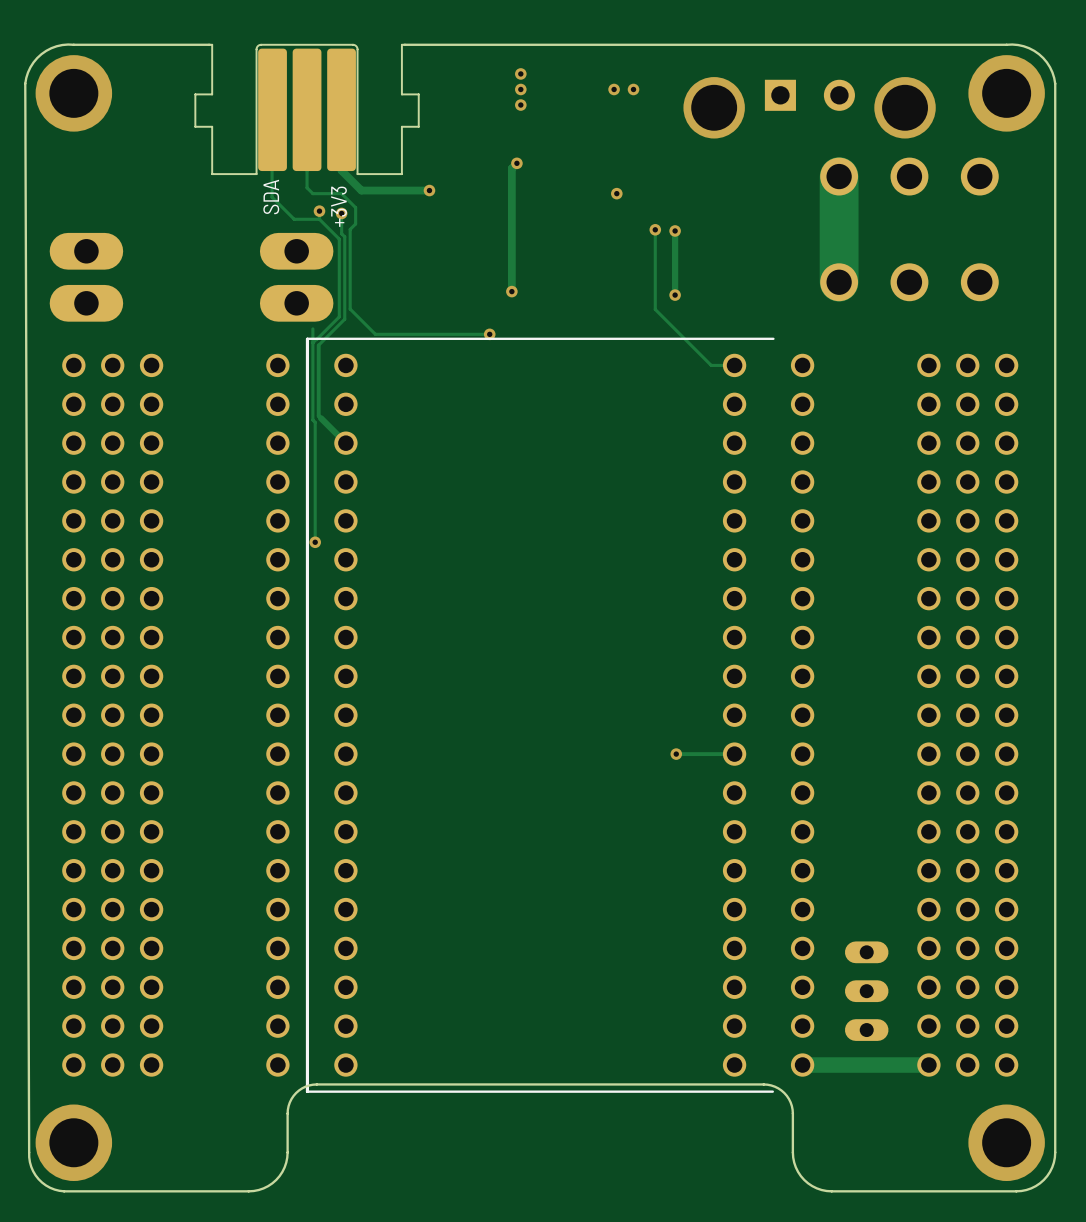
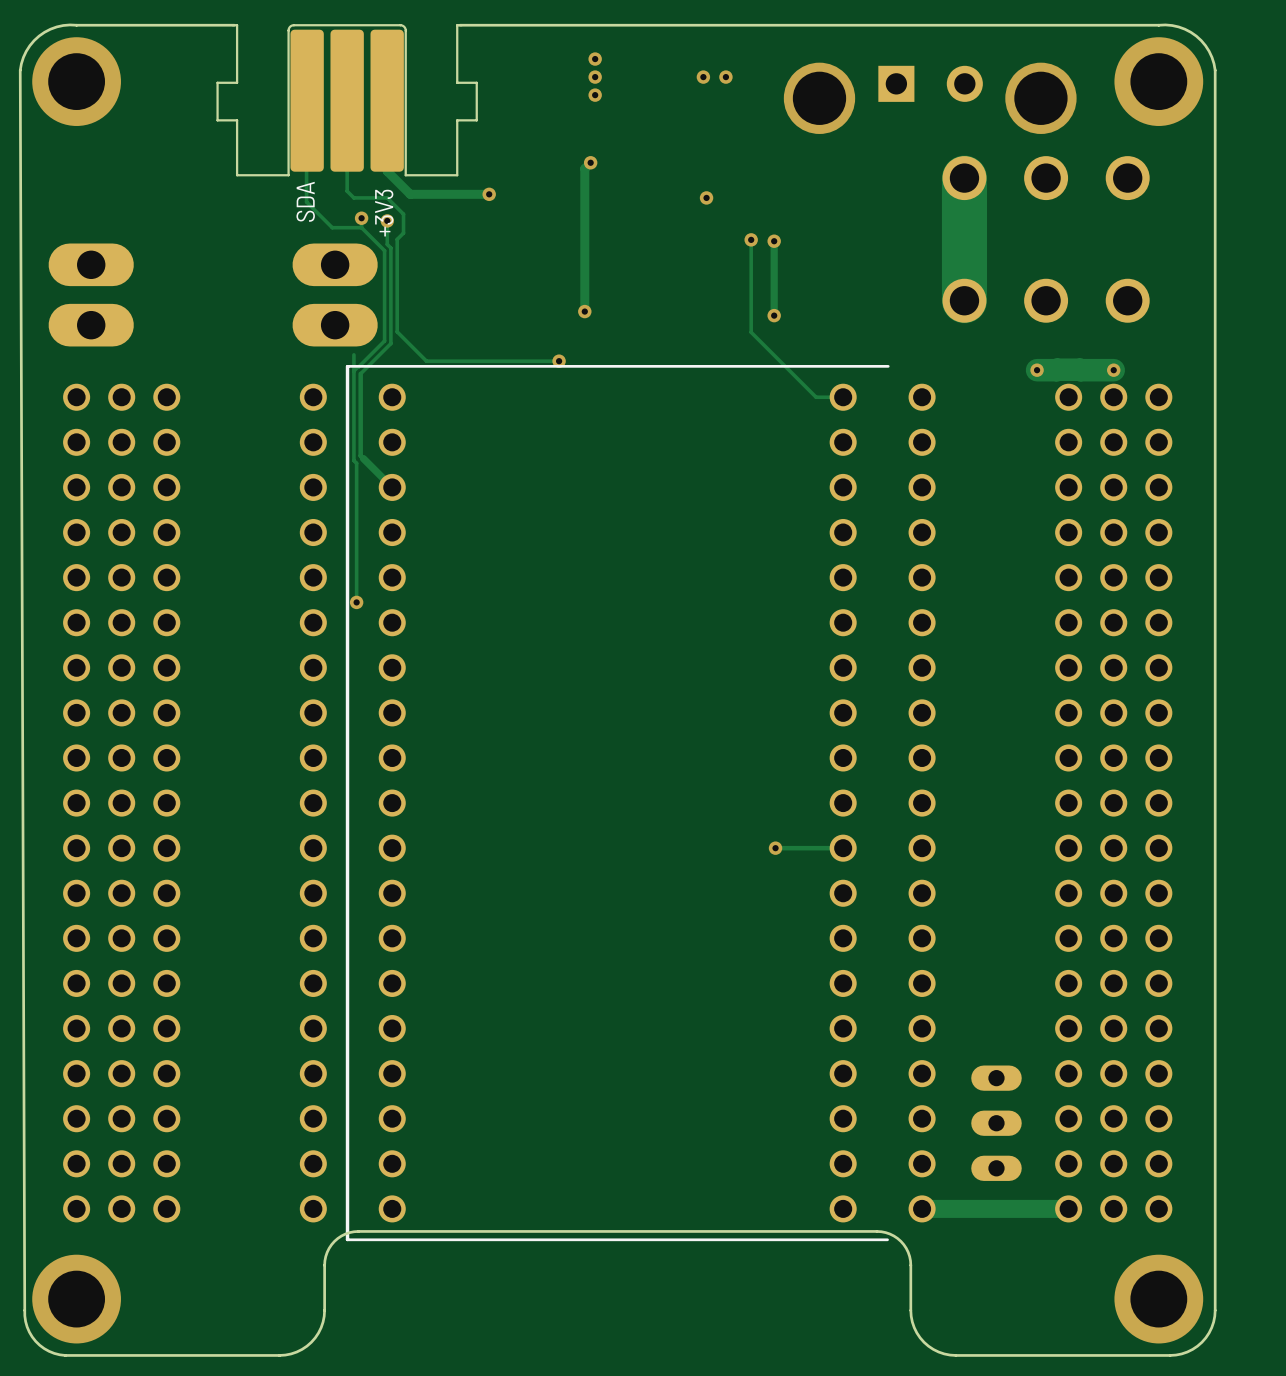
via: none -> (1037, 370)
track: none -> (1113, 370) (1037, 370)
via: none -> (1113, 370)

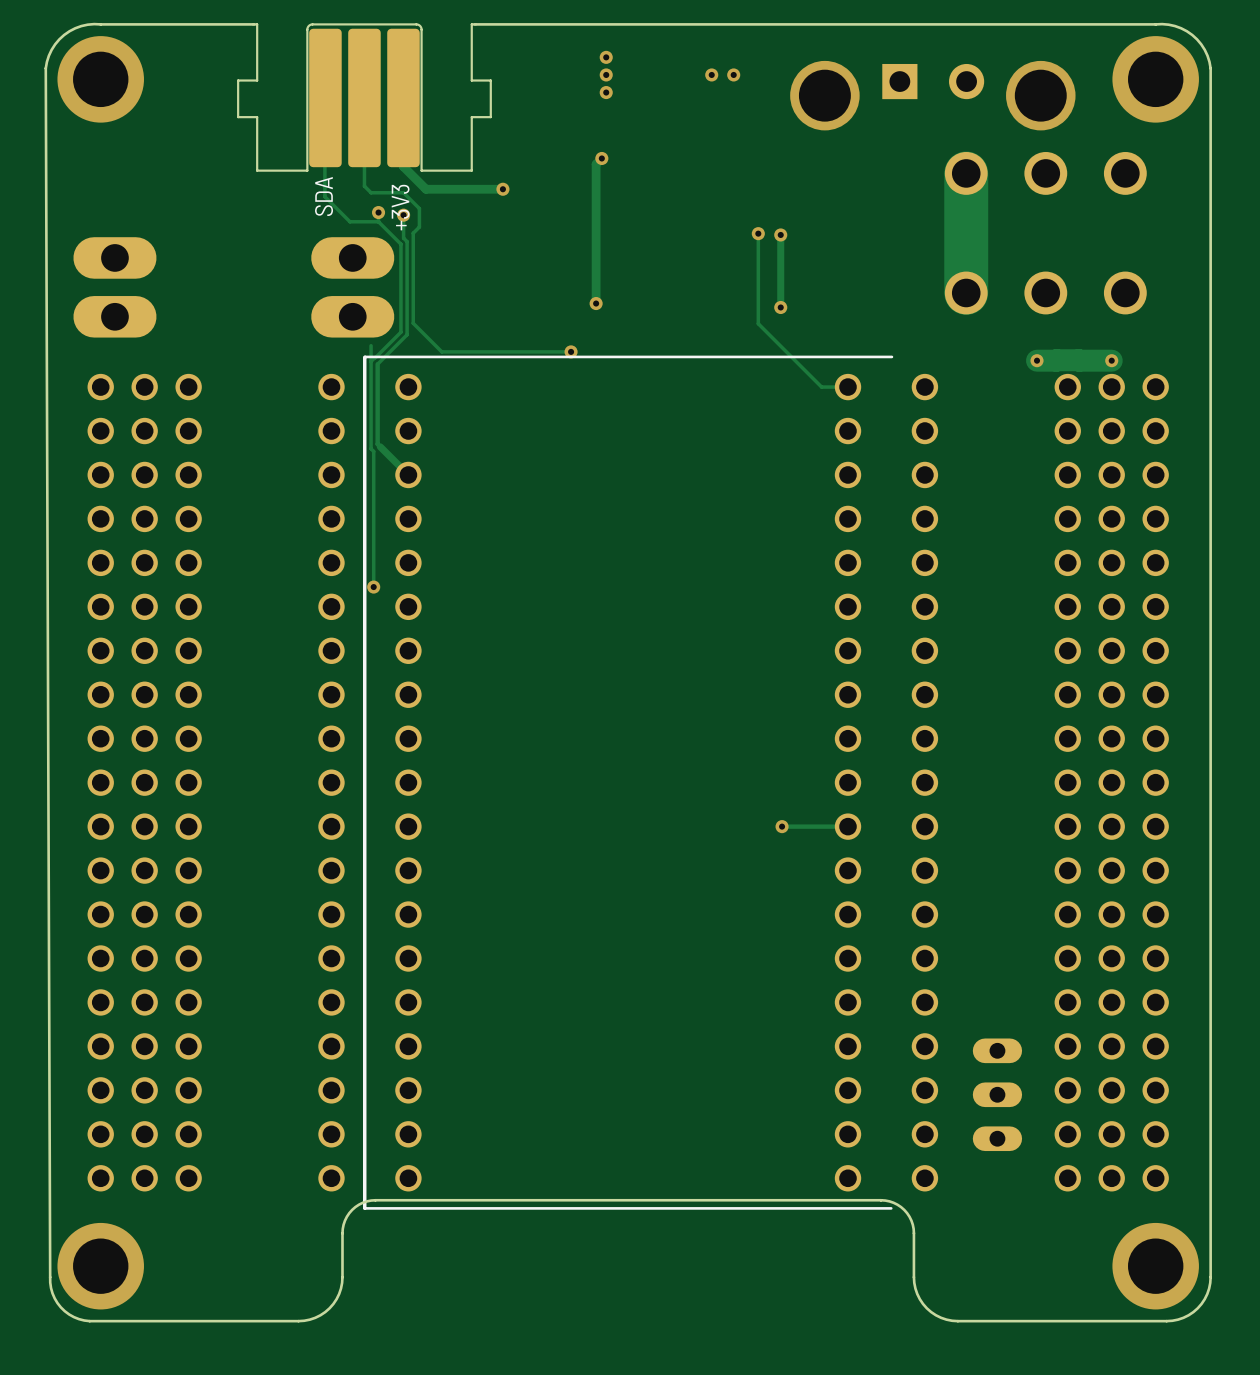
via: (706, 197) -> none
track: (1068, 1208) (922, 1208) -> none

